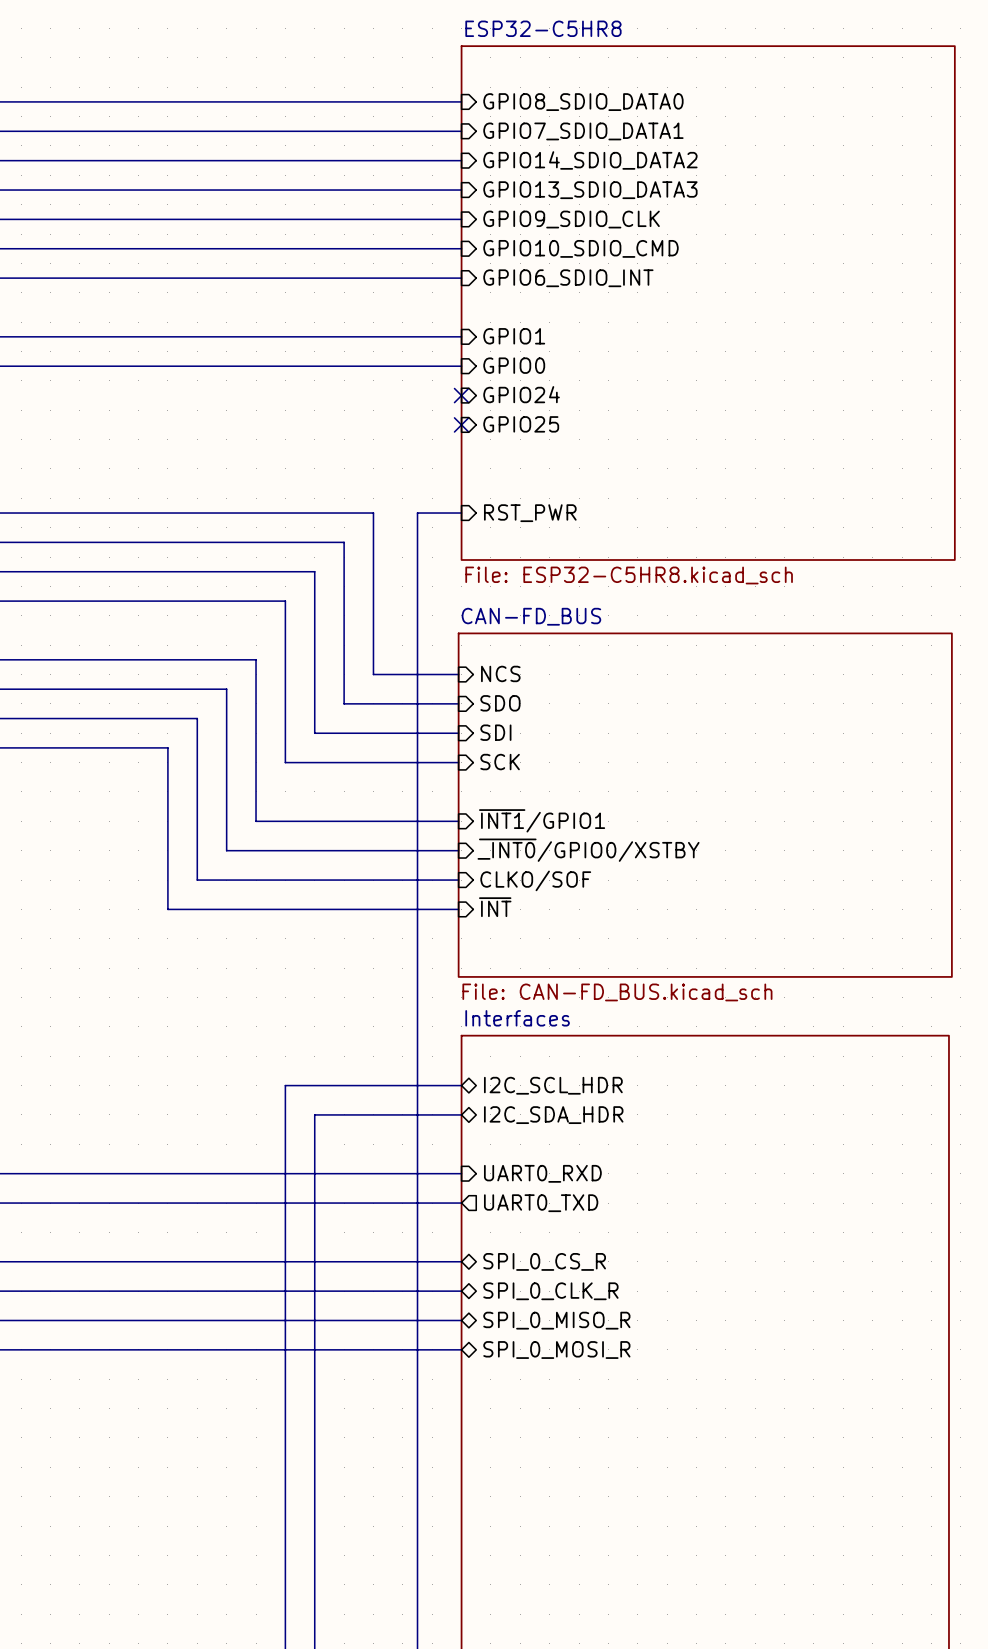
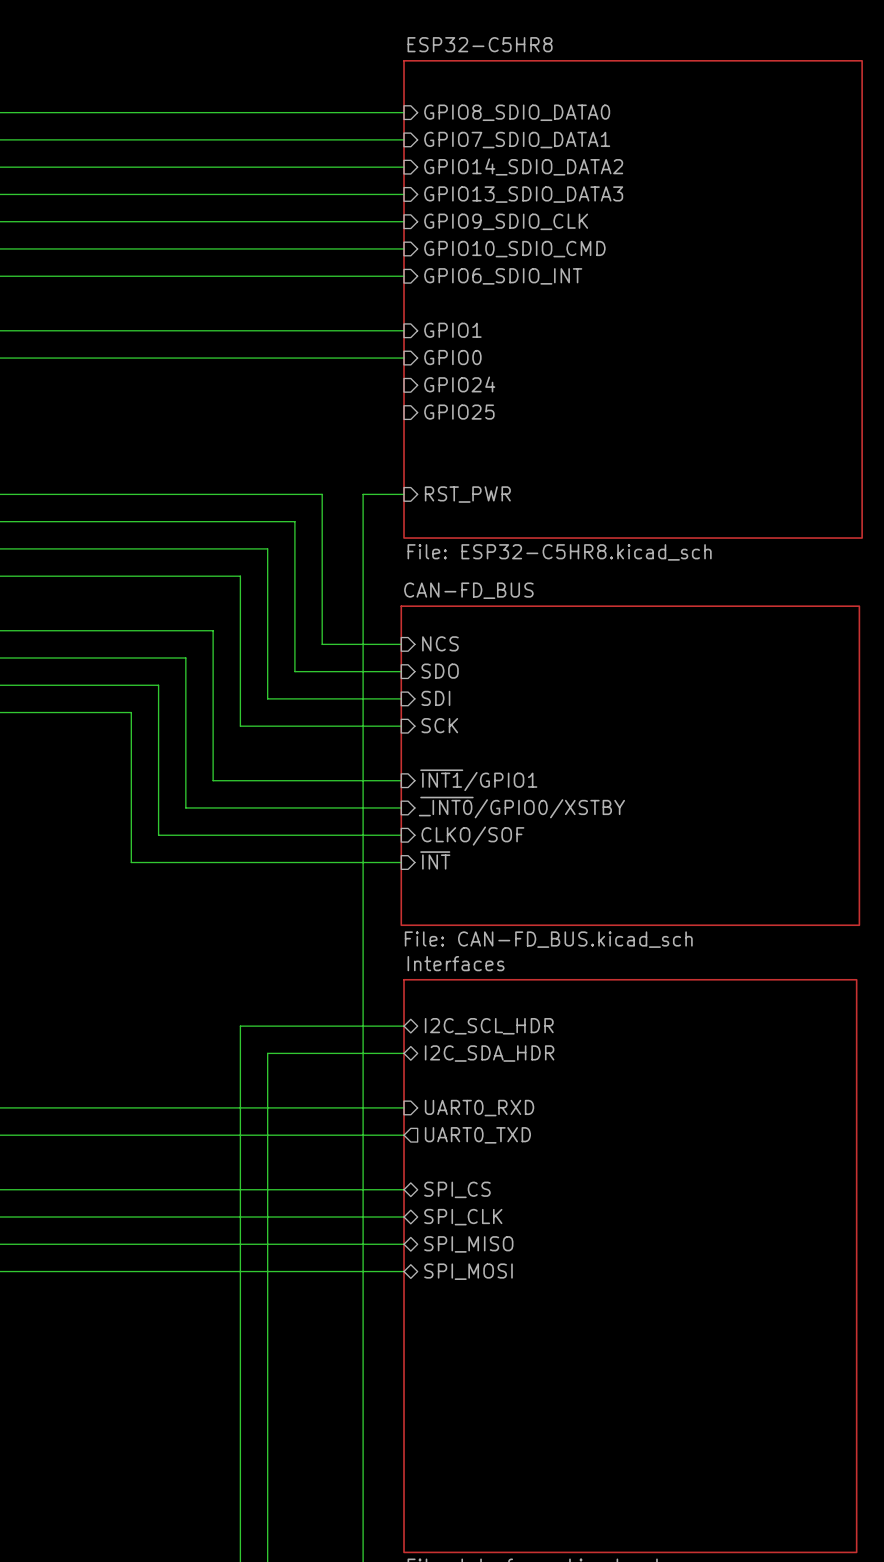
no-connect mark: (461, 395) -> none
no-connect mark: (461, 424) -> none
sheet pin: SPI_0_CS_R (544, 1261) -> SPI_CS (457, 1189)
sheet pin: SPI_0_CLK_R (550, 1291) -> SPI_CLK (463, 1217)
sheet pin: SPI_0_MISO_R (556, 1320) -> SPI_MISO (468, 1244)
sheet pin: SPI_0_MOSI_R (556, 1350) -> SPI_MOSI (468, 1271)

